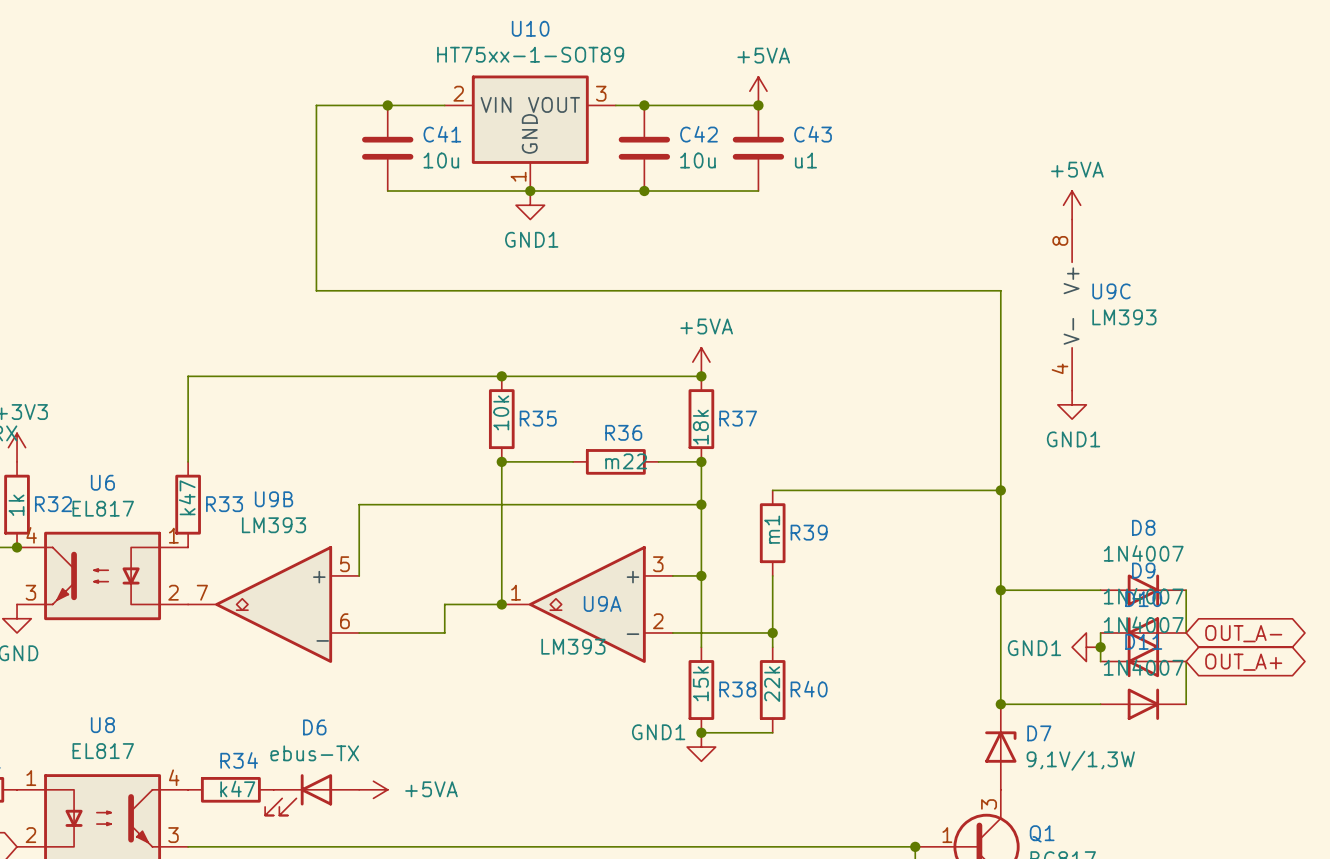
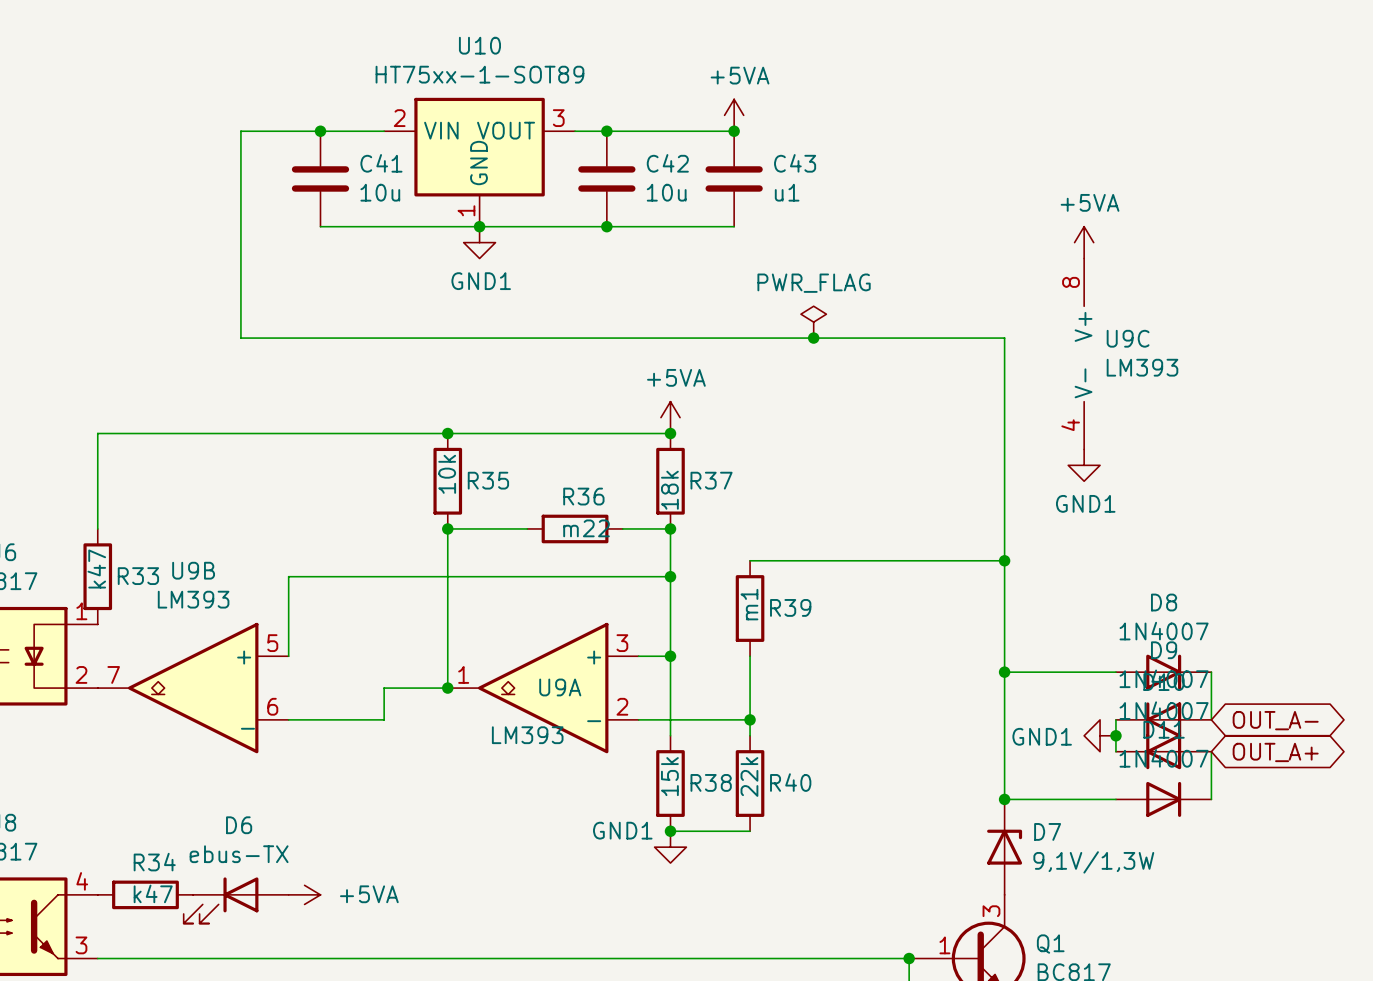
power symbol: none -> PWR_FLAG (813, 322)
junction: none -> (813, 338)

